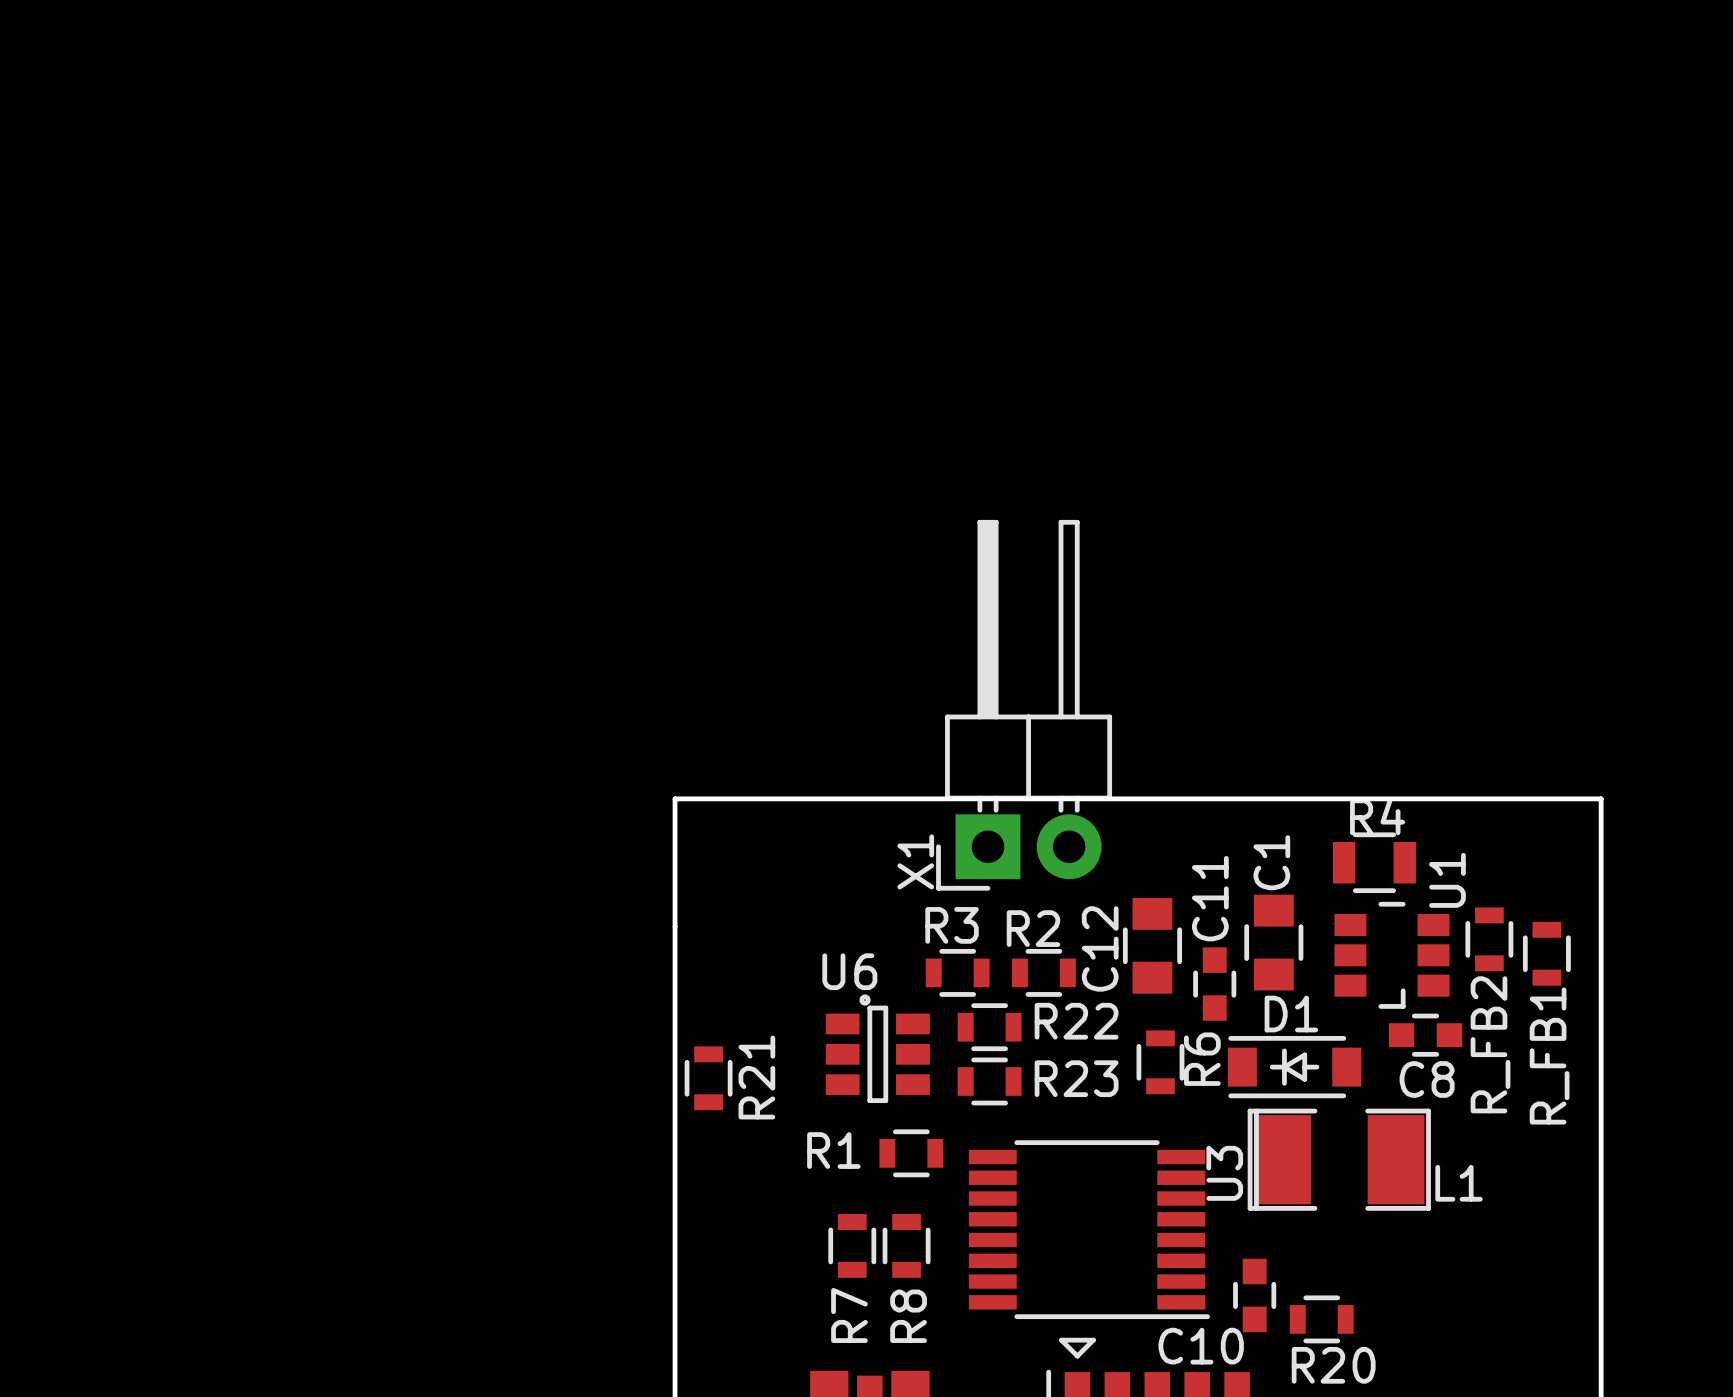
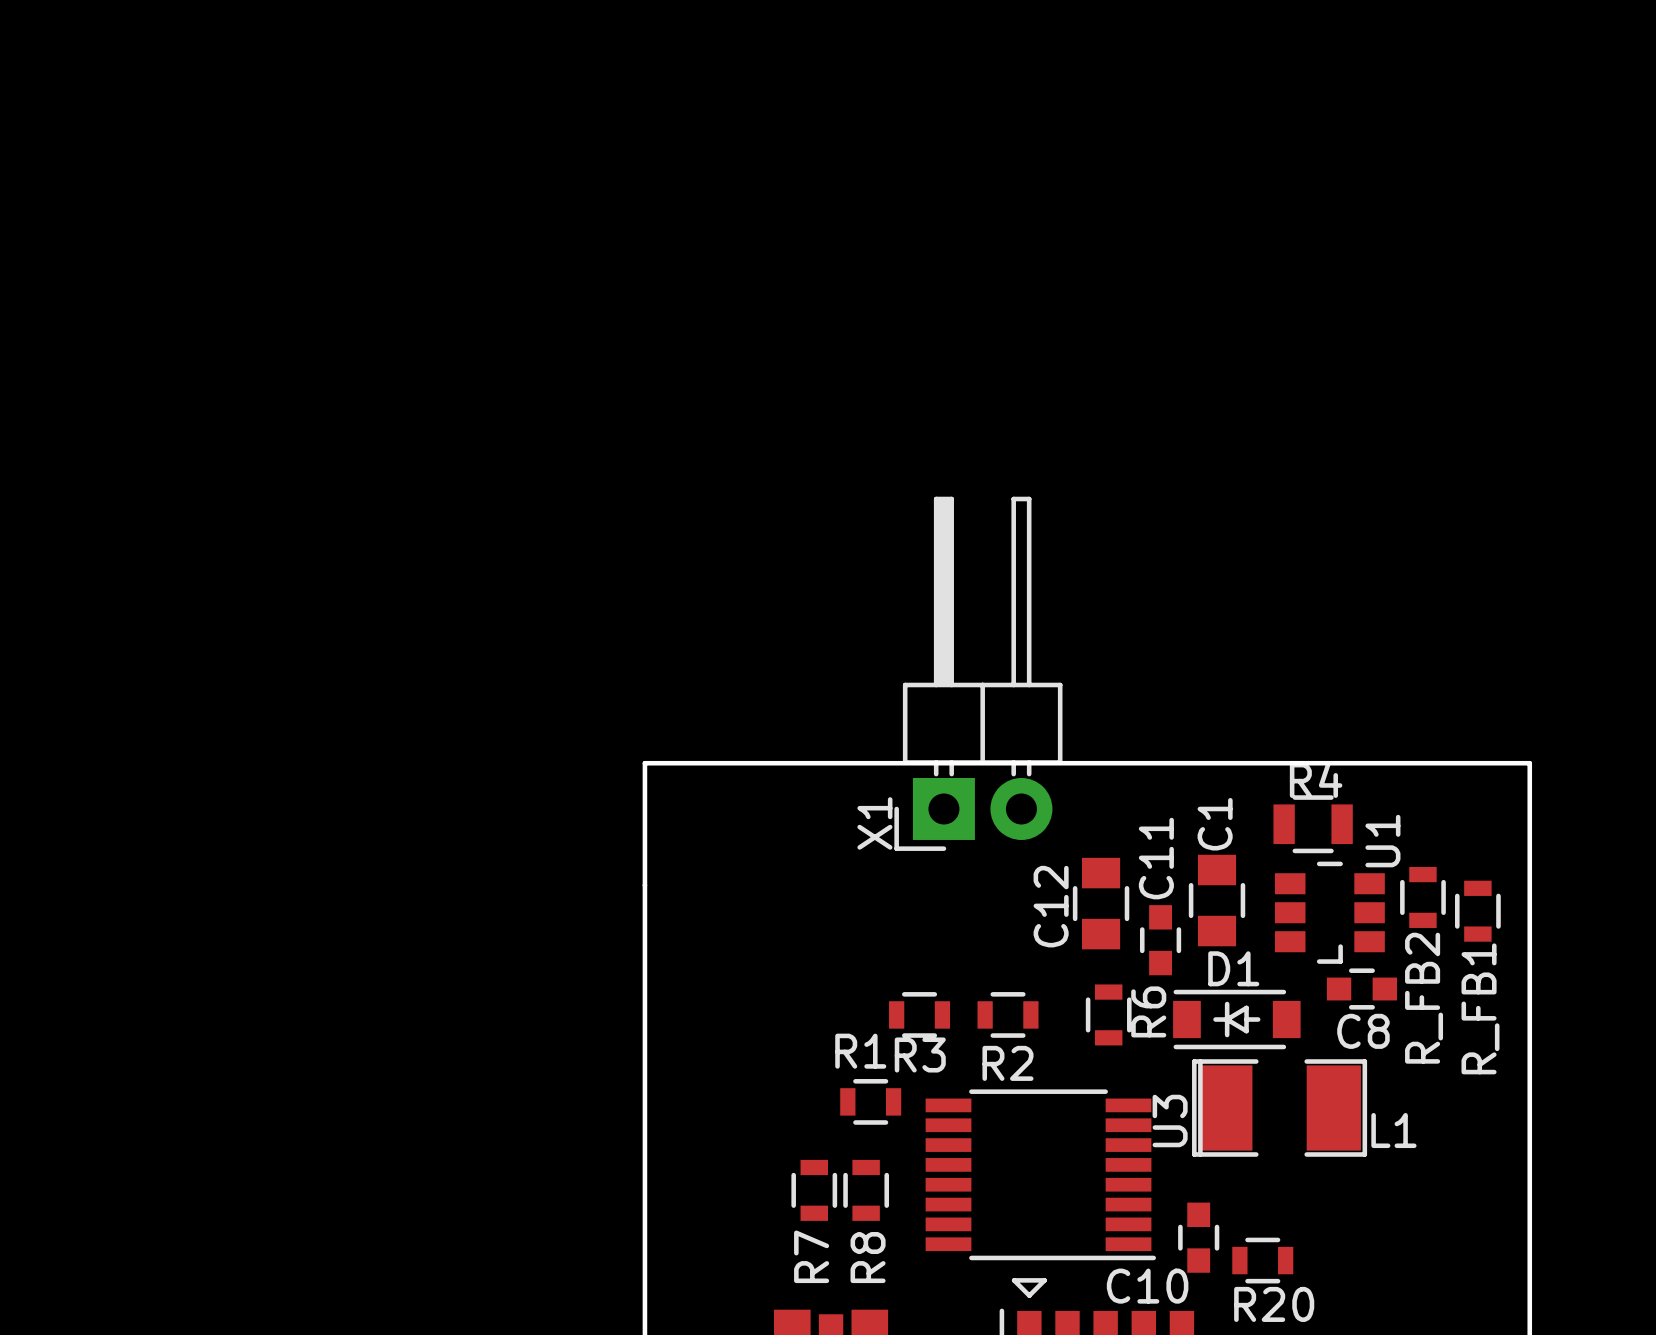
R3 name position: R3 (952, 925) -> R3 (920, 1054)
R2 name position: R2 (1033, 928) -> R2 (1007, 1063)
R3 position: (957, 972) -> (919, 1014)
R2 position: (1043, 972) -> (1008, 1014)
R22: (989, 1027) -> none
U6: (877, 1048) -> none
R21: (708, 1078) -> none
R23: (989, 1081) -> none
R1 name position: R1 (833, 1150) -> R1 (860, 1051)

